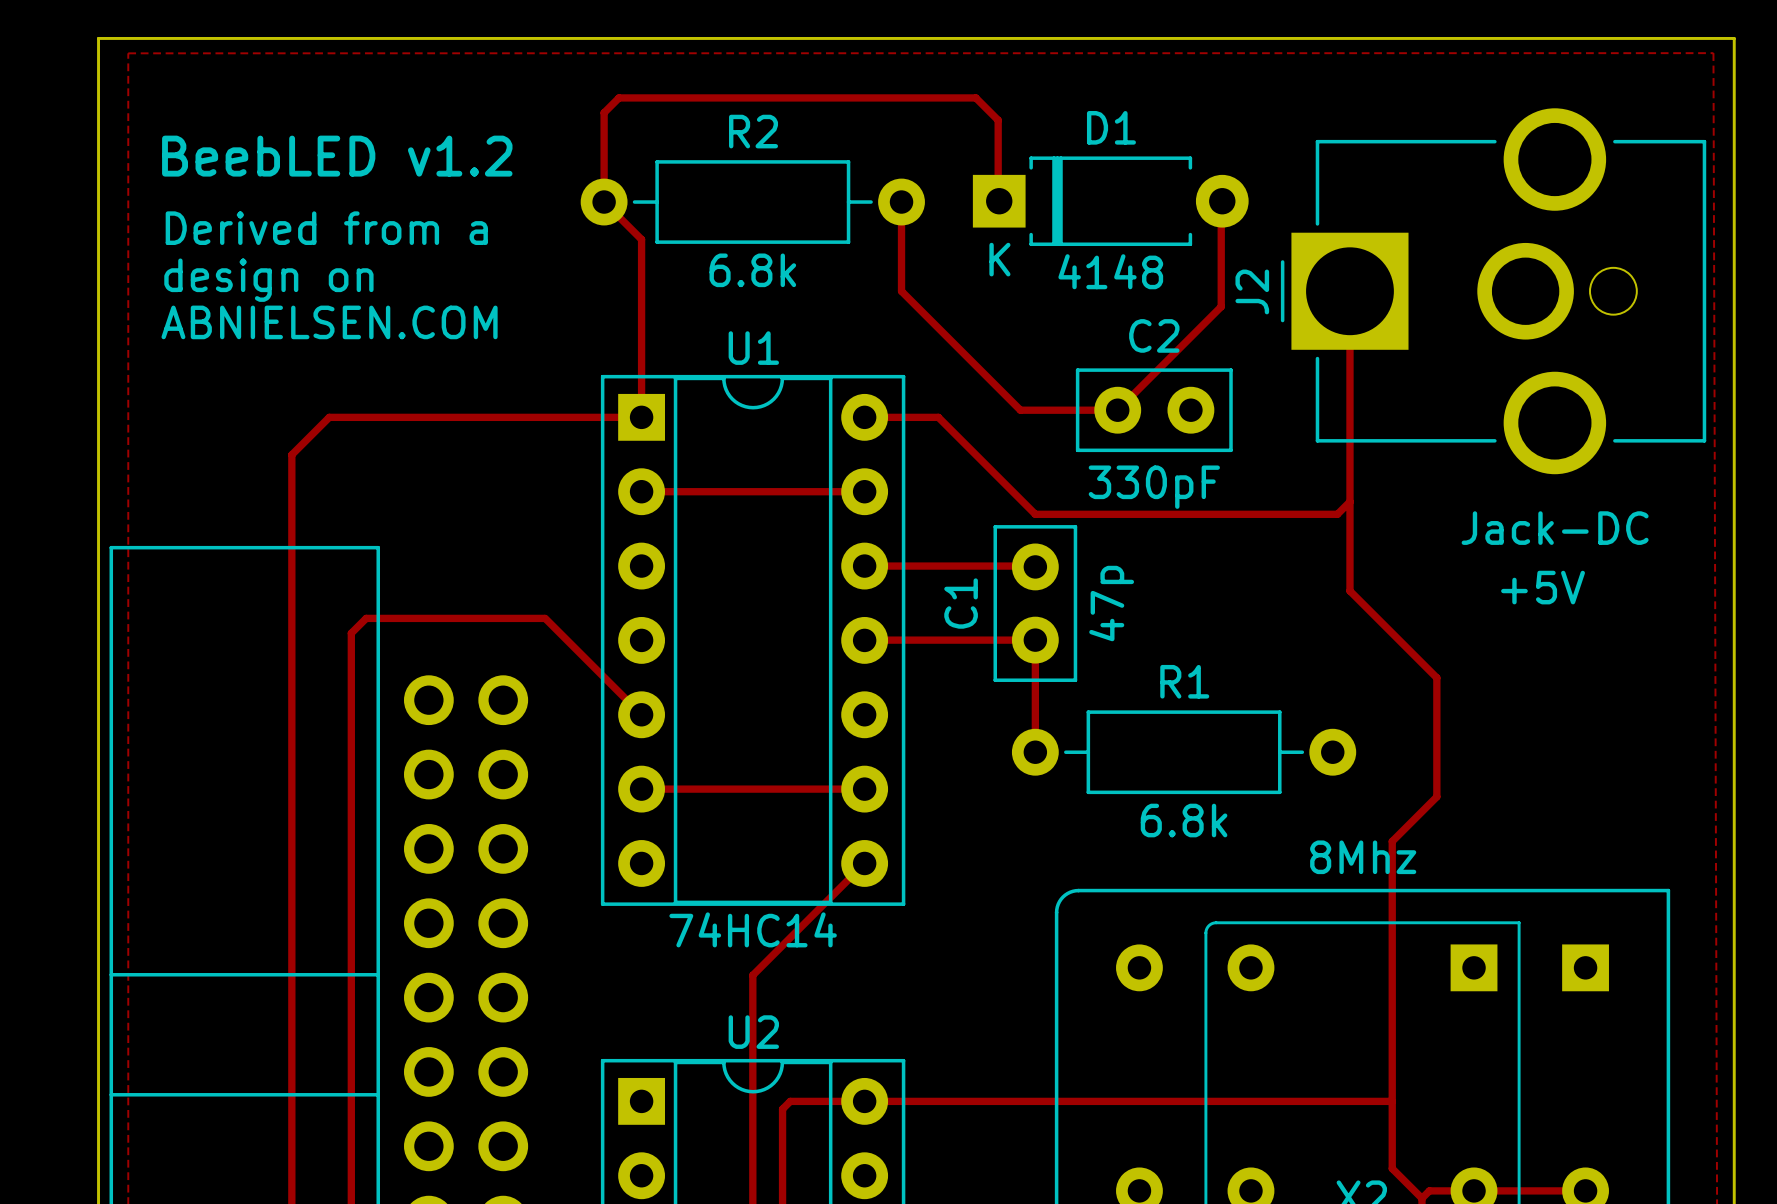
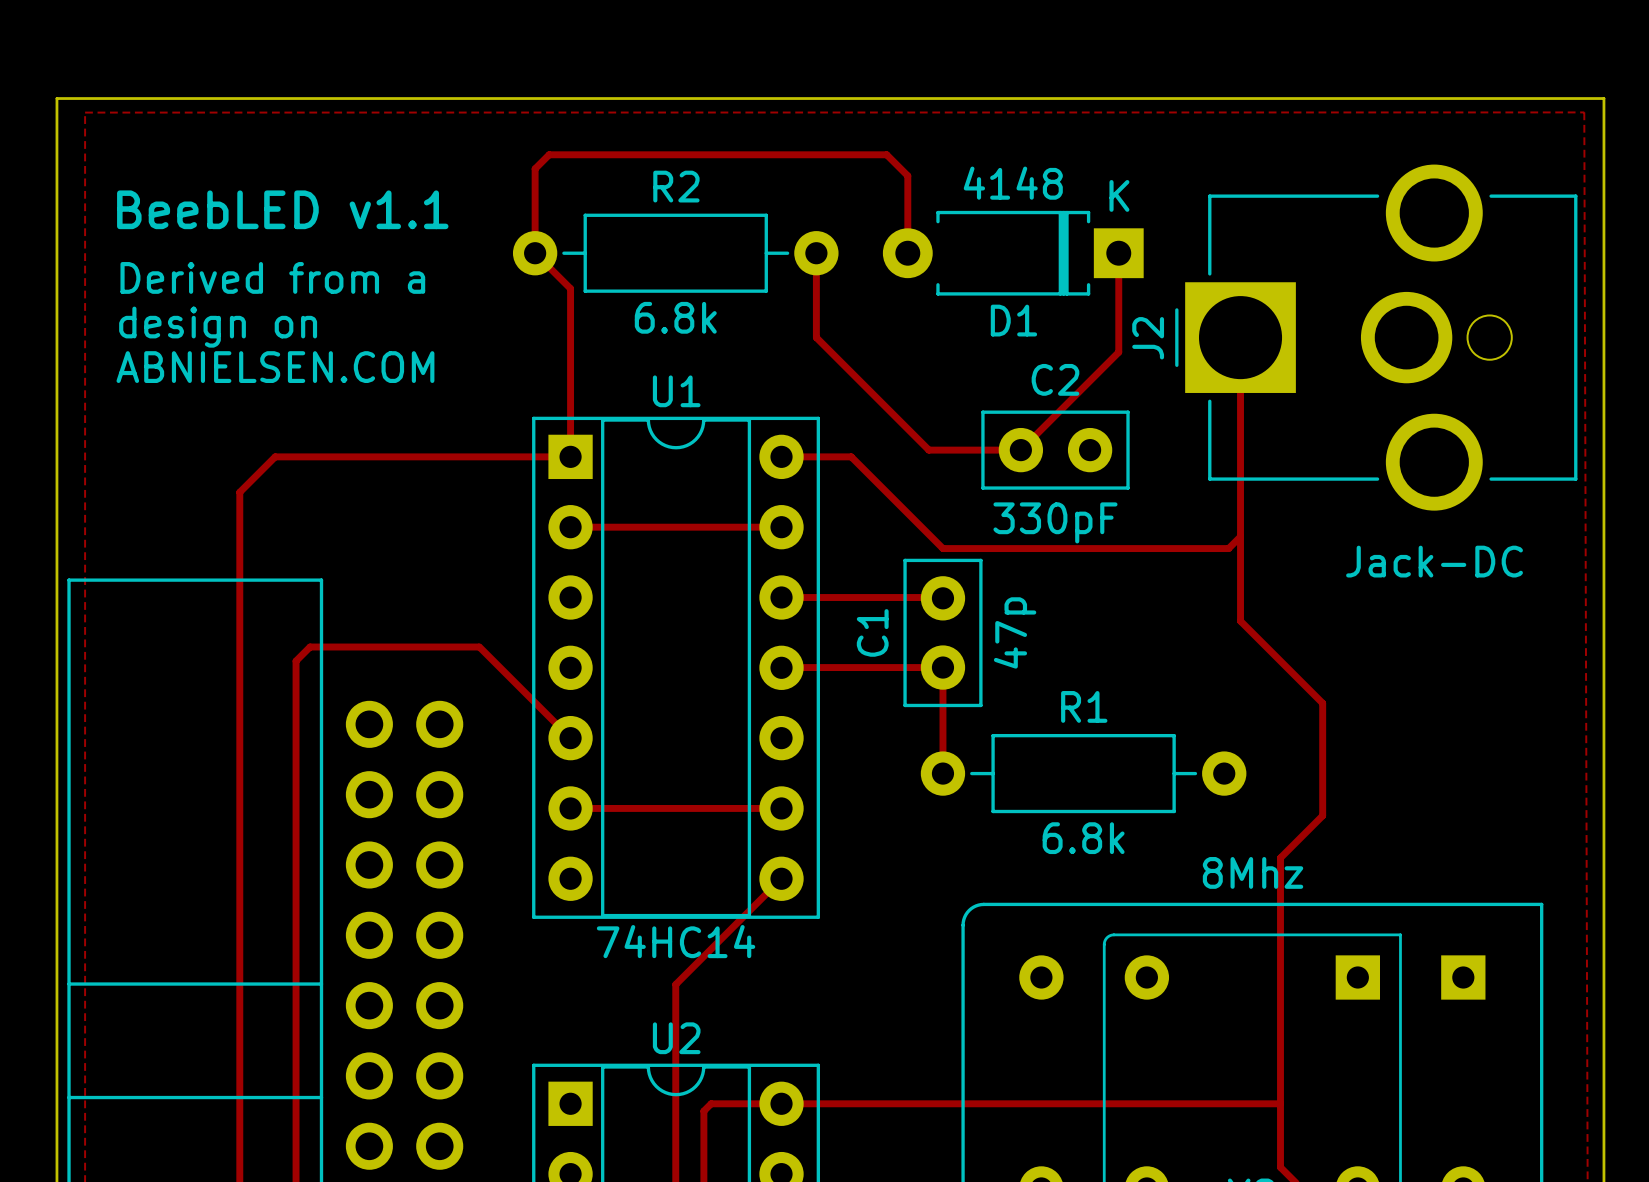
text: BeebLED v1.2 (337, 156) -> BeebLED v1.1 (282, 209)
D1 rotation: 0° (1110, 201) -> 180° (1013, 253)
text: +5V (1543, 587) -> none

